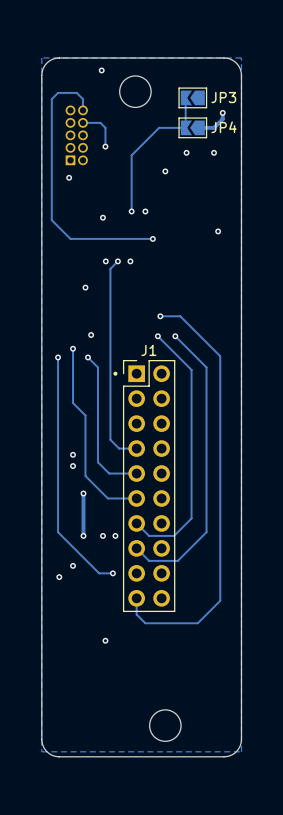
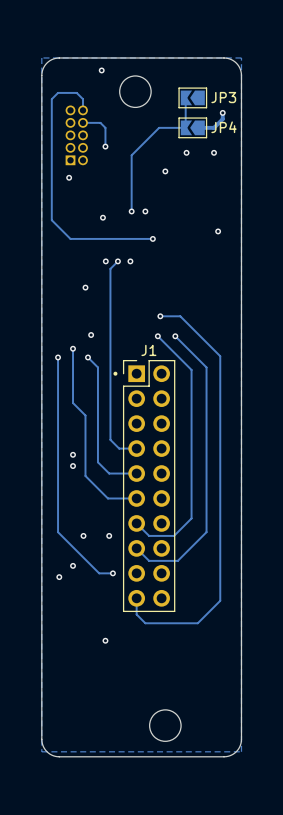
track: (83, 493) (83, 534) -> none
via: (83, 493) -> none
via: (102, 535) -> none
via: none -> (109, 535)
via: (115, 535) -> none

